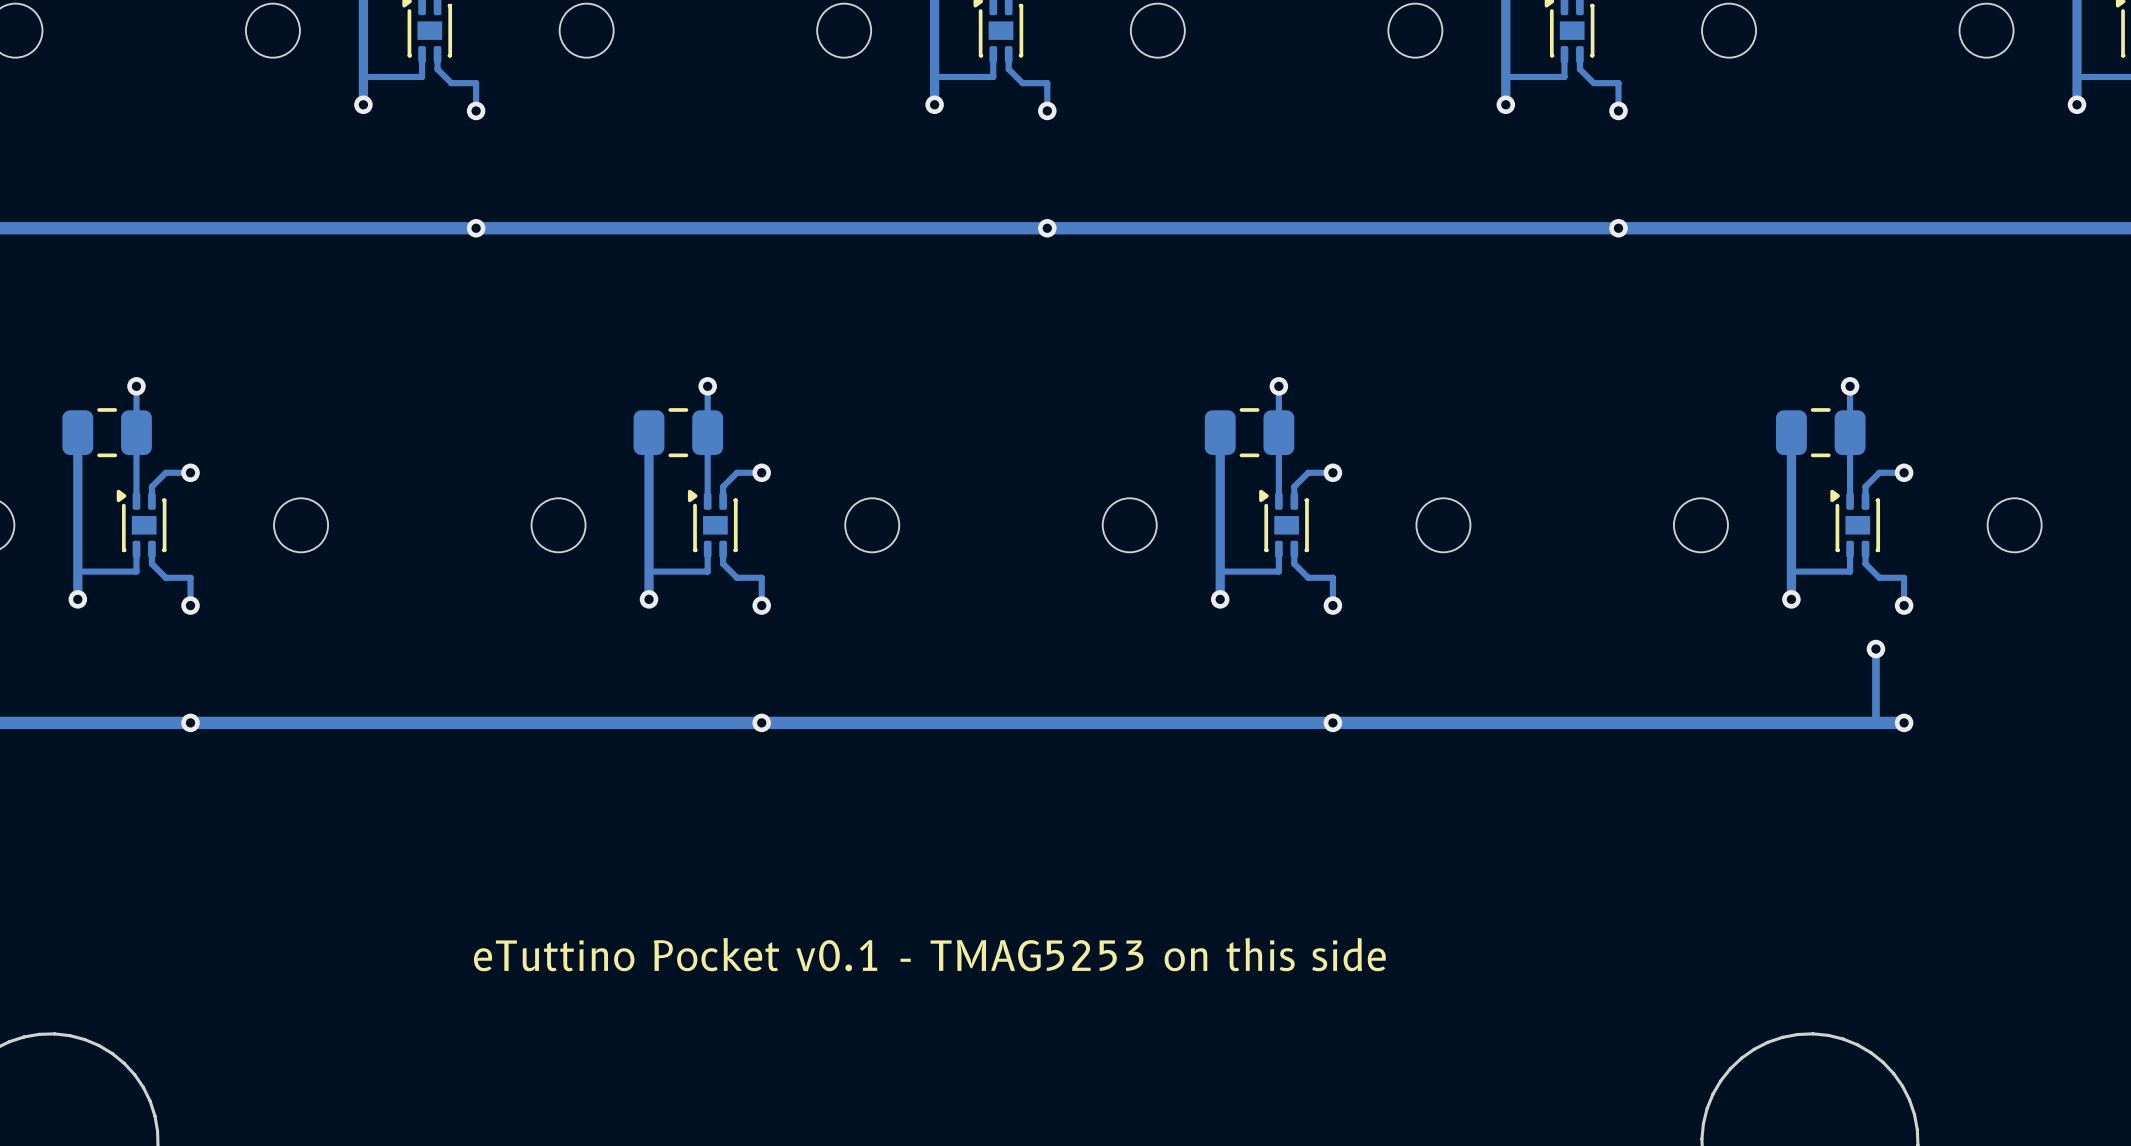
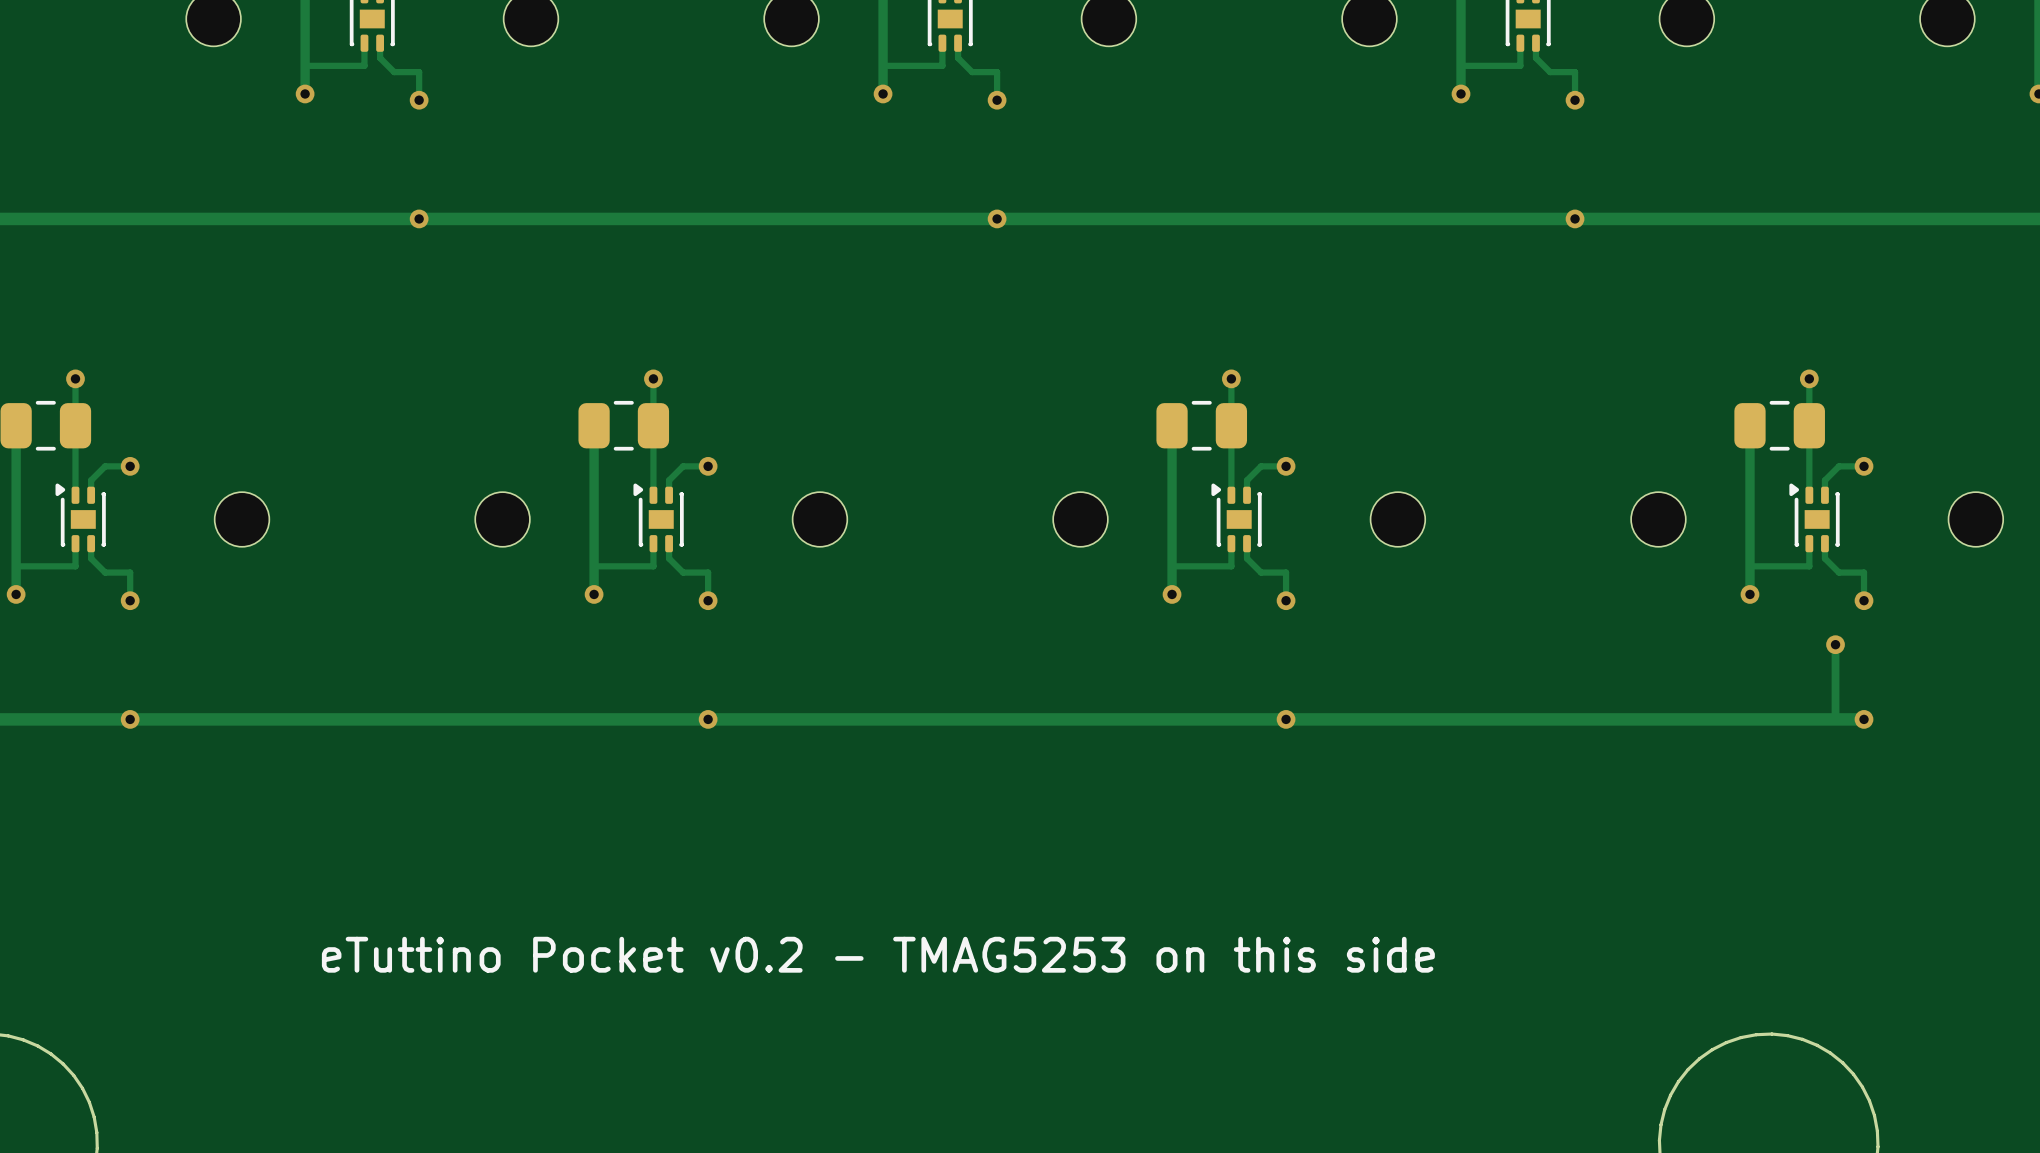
text: eTuttino Pocket v0.1 - TMAG5253 on this side (929, 954) -> eTuttino Pocket v0.2 - TMAG5253 on this side (878, 954)

